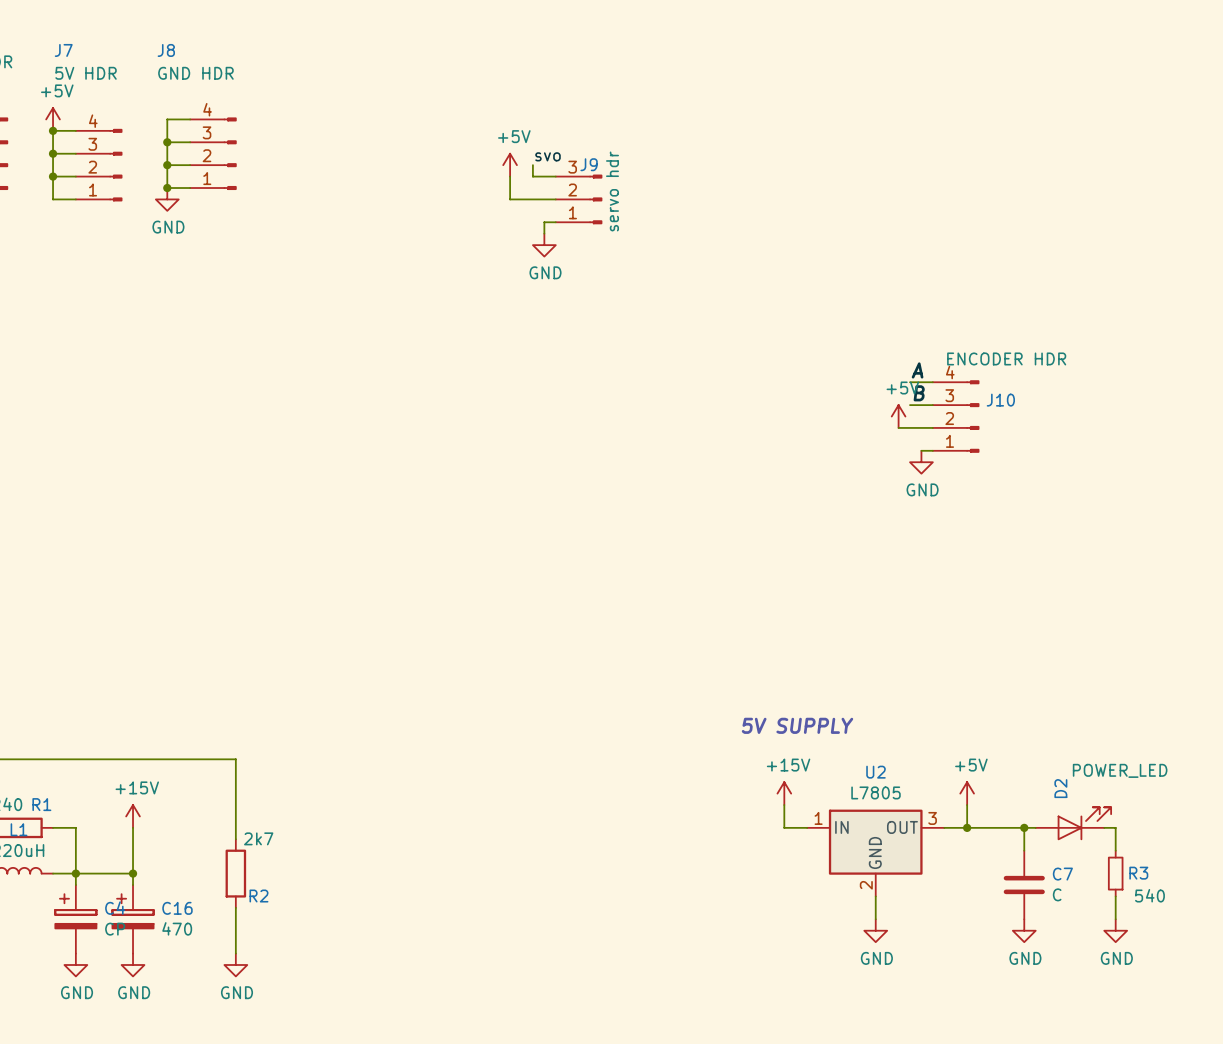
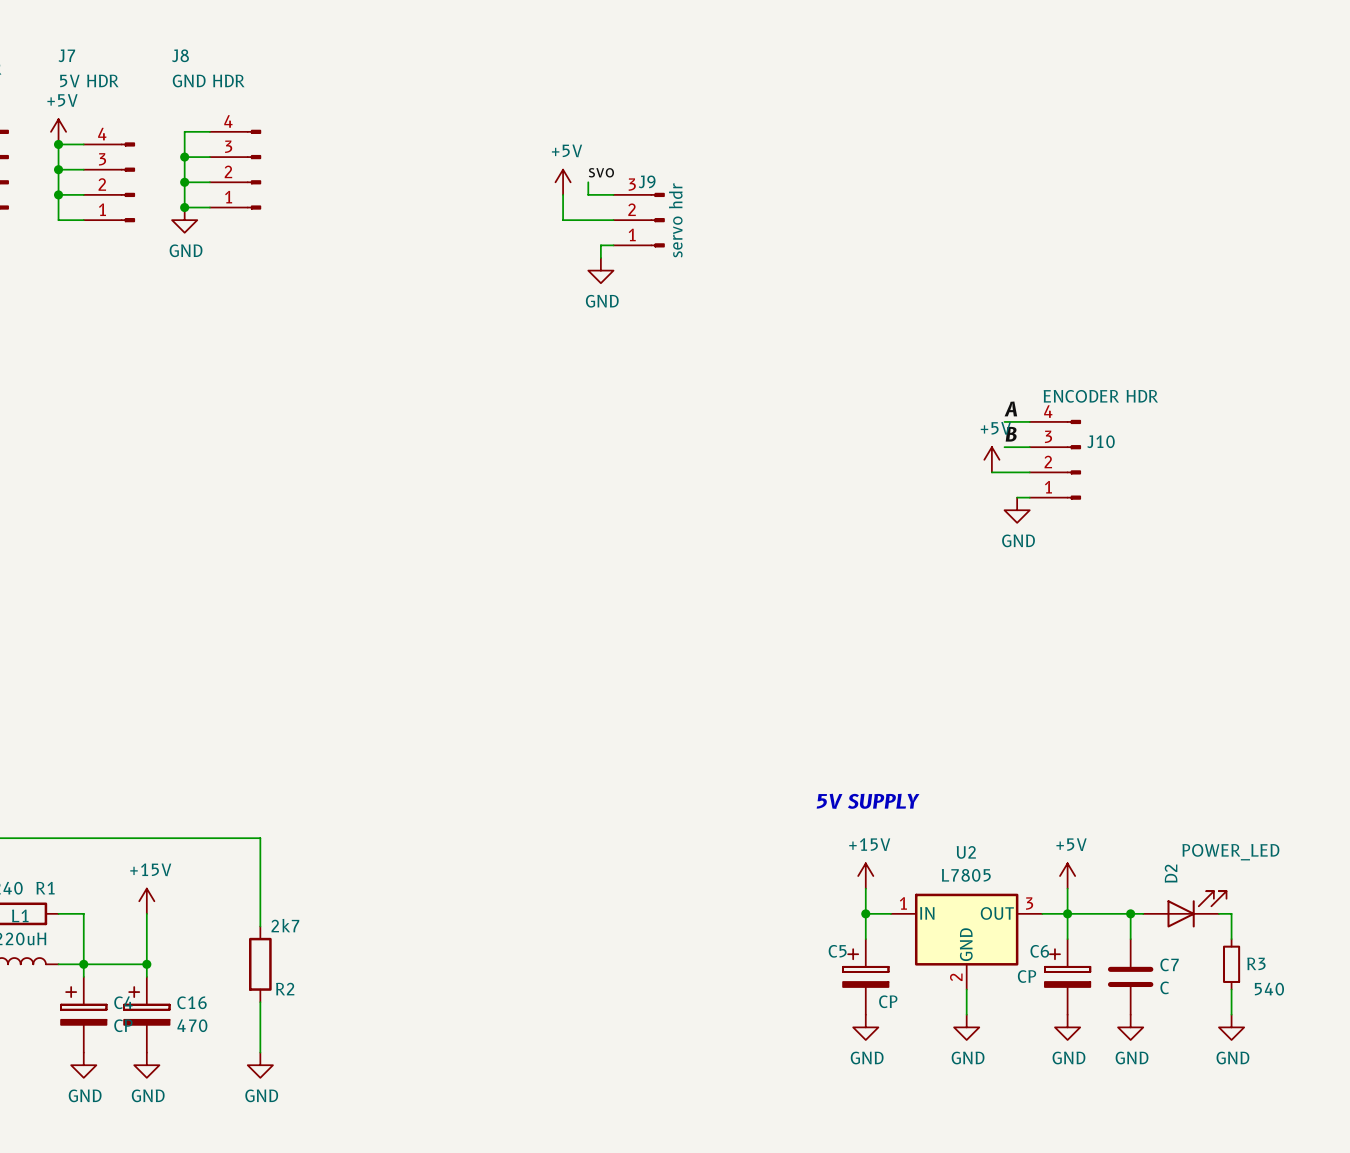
wire: none -> (865, 913) (865, 939)
junction: none -> (865, 913)
wire: none -> (1067, 913) (1067, 939)
C5: none -> CP (865, 976)
C6: none -> CP (1067, 976)
power symbol: none -> GND (865, 1027)
power symbol: none -> GND (1067, 1027)

